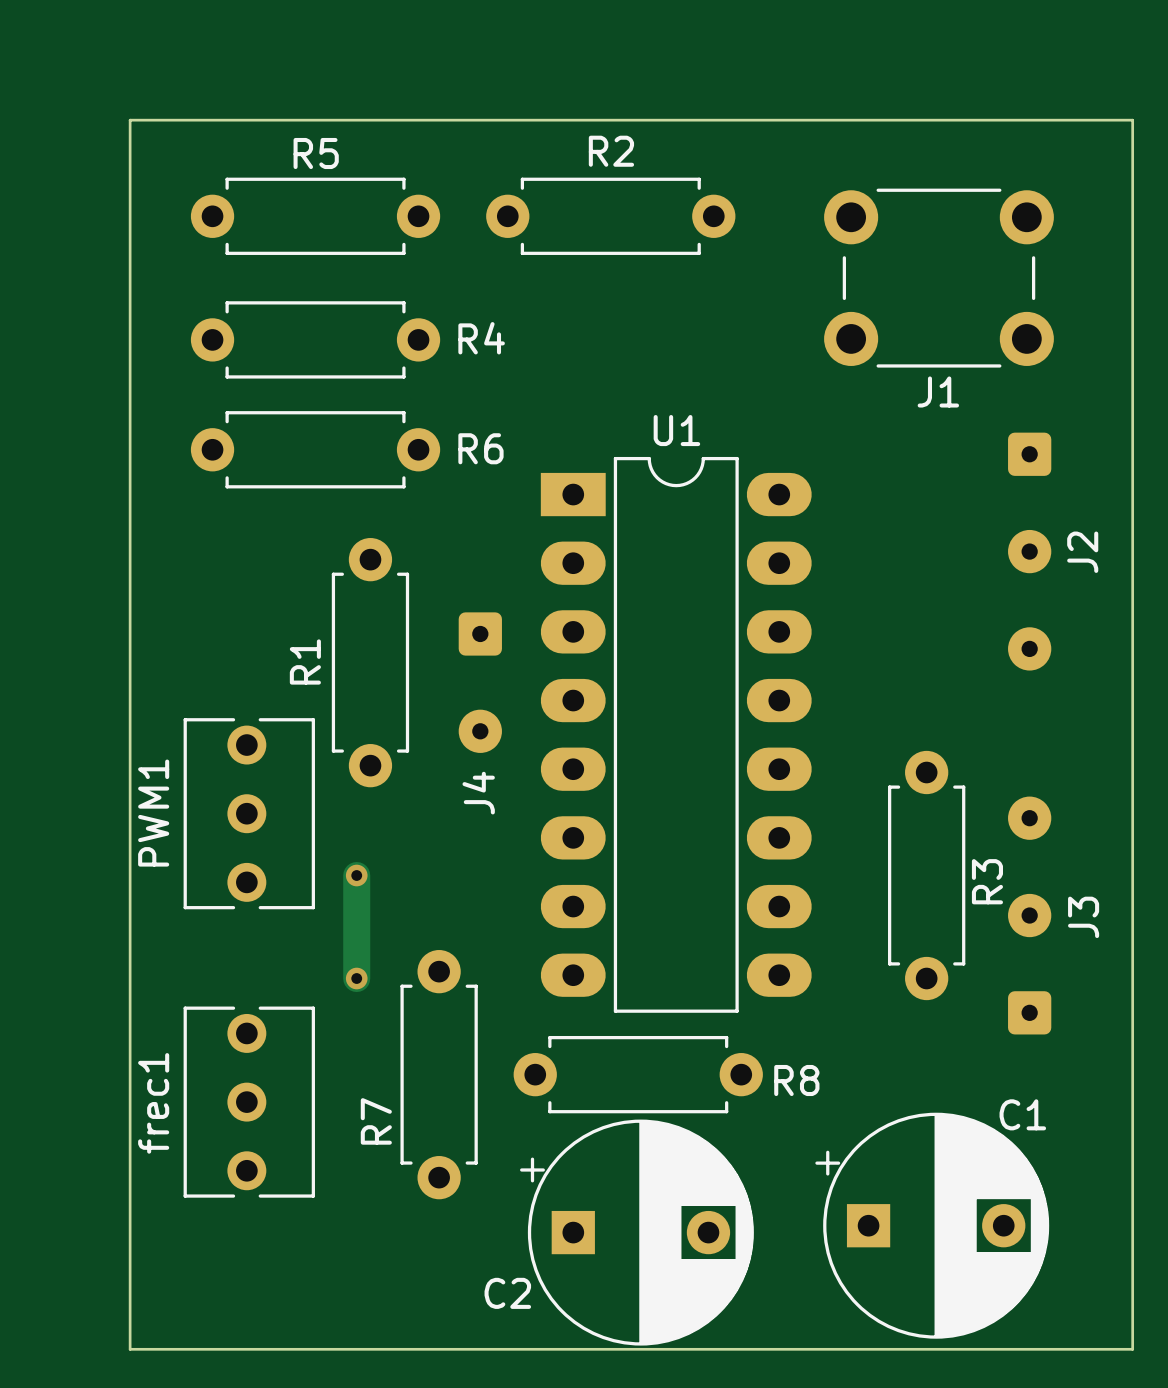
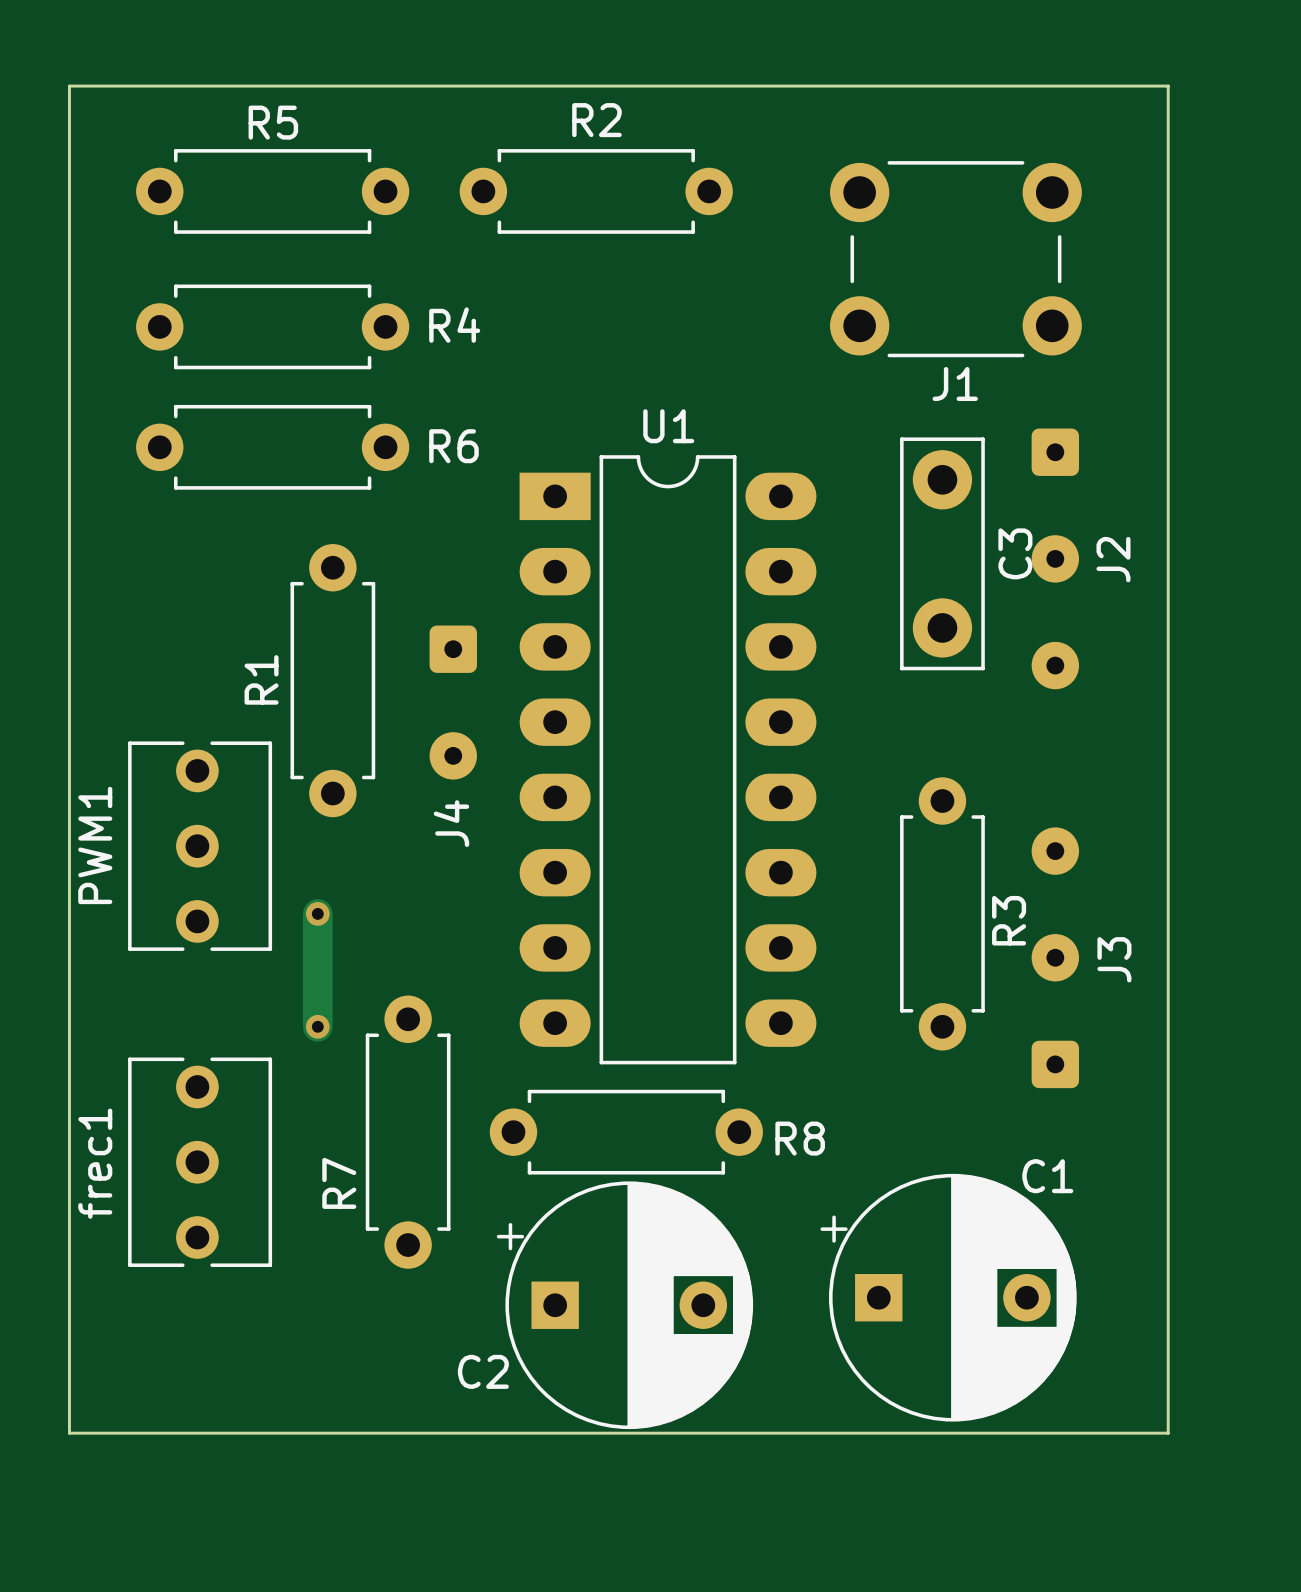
C3: none -> (942, 553)

